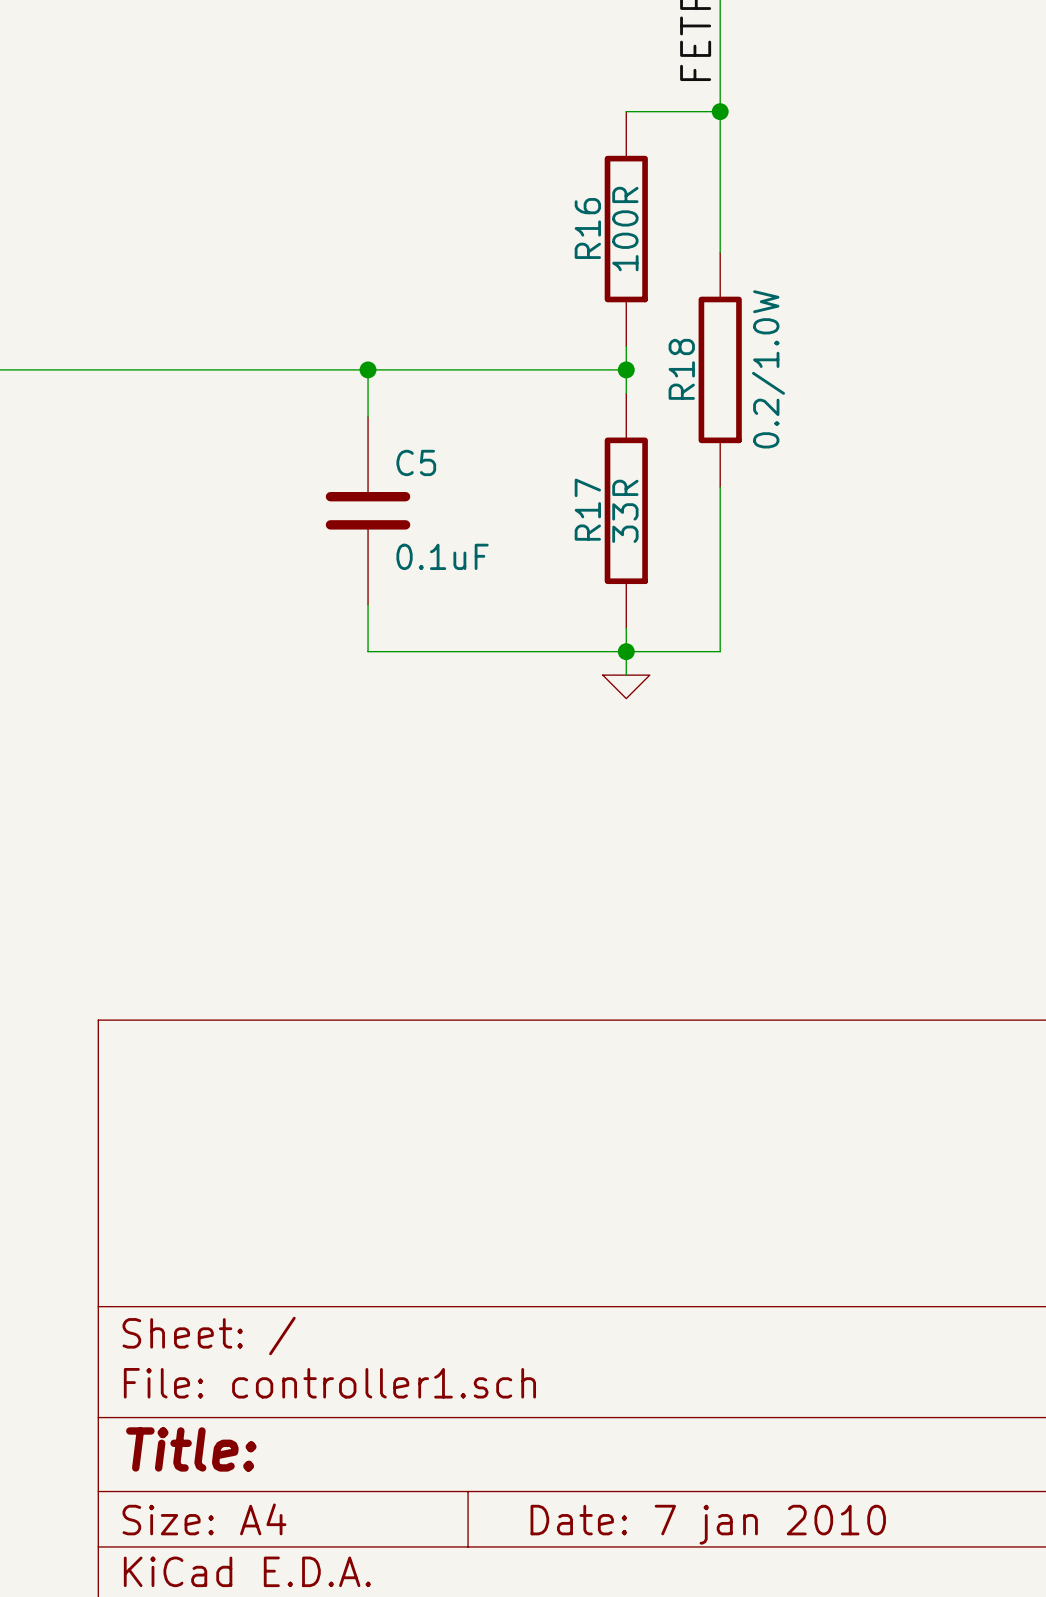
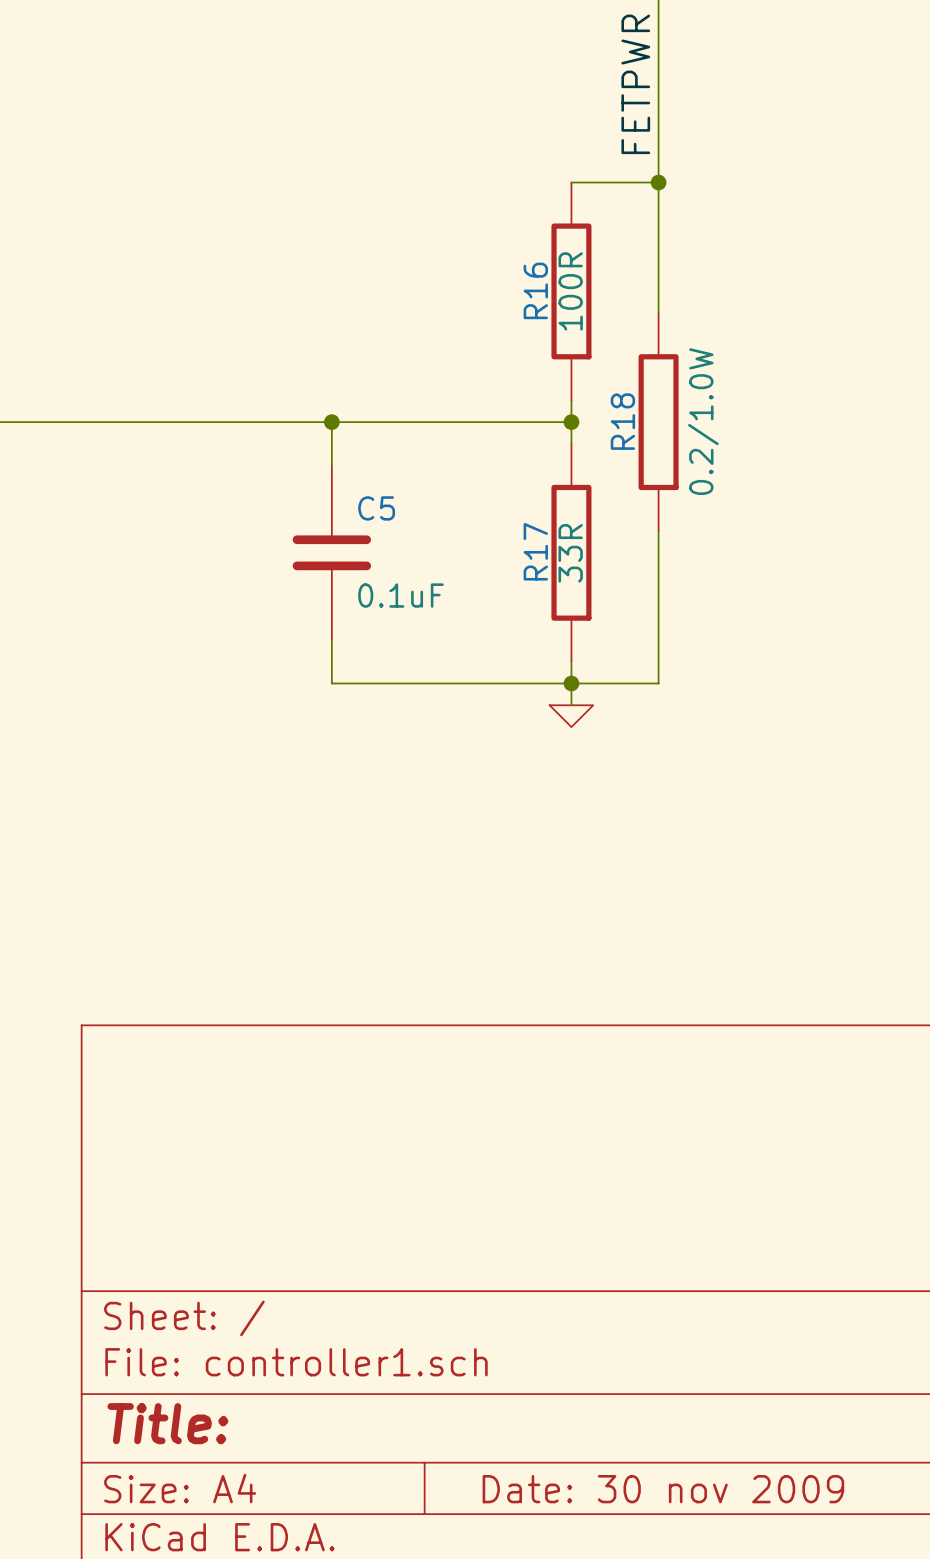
title block: Date: 7 jan 2010 (708, 1524) -> Date: 30 nov 2009 (663, 1489)

